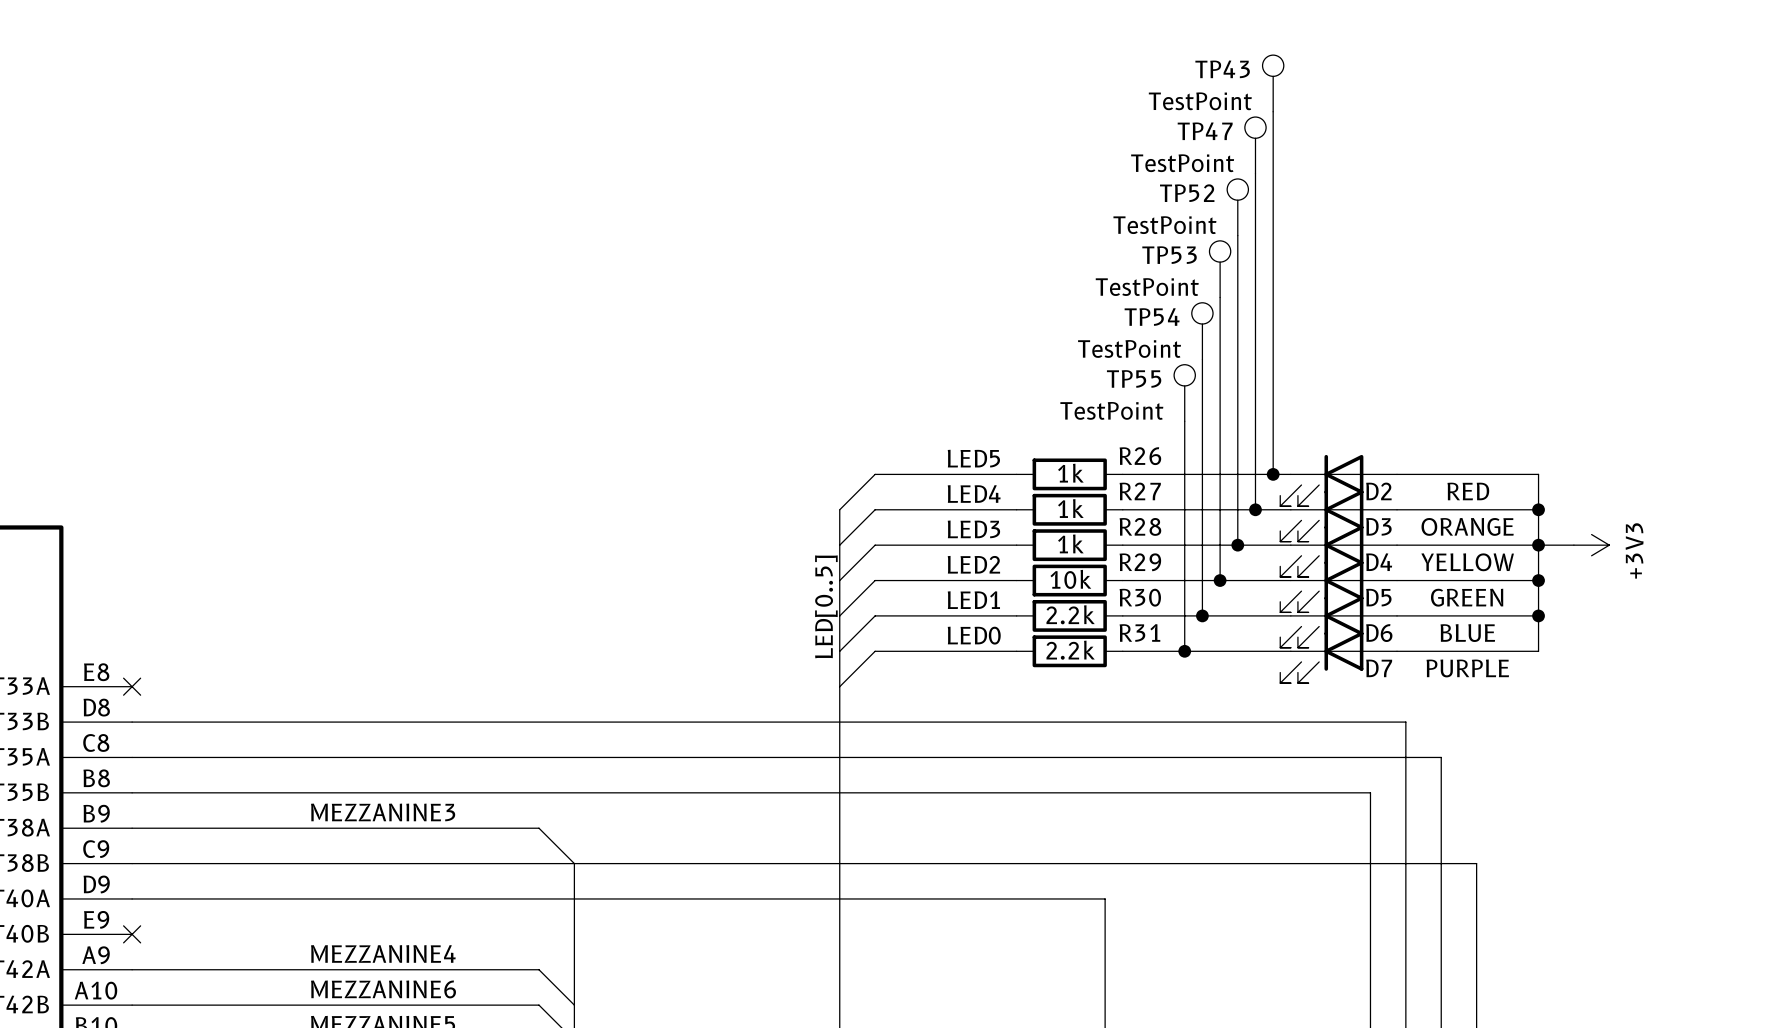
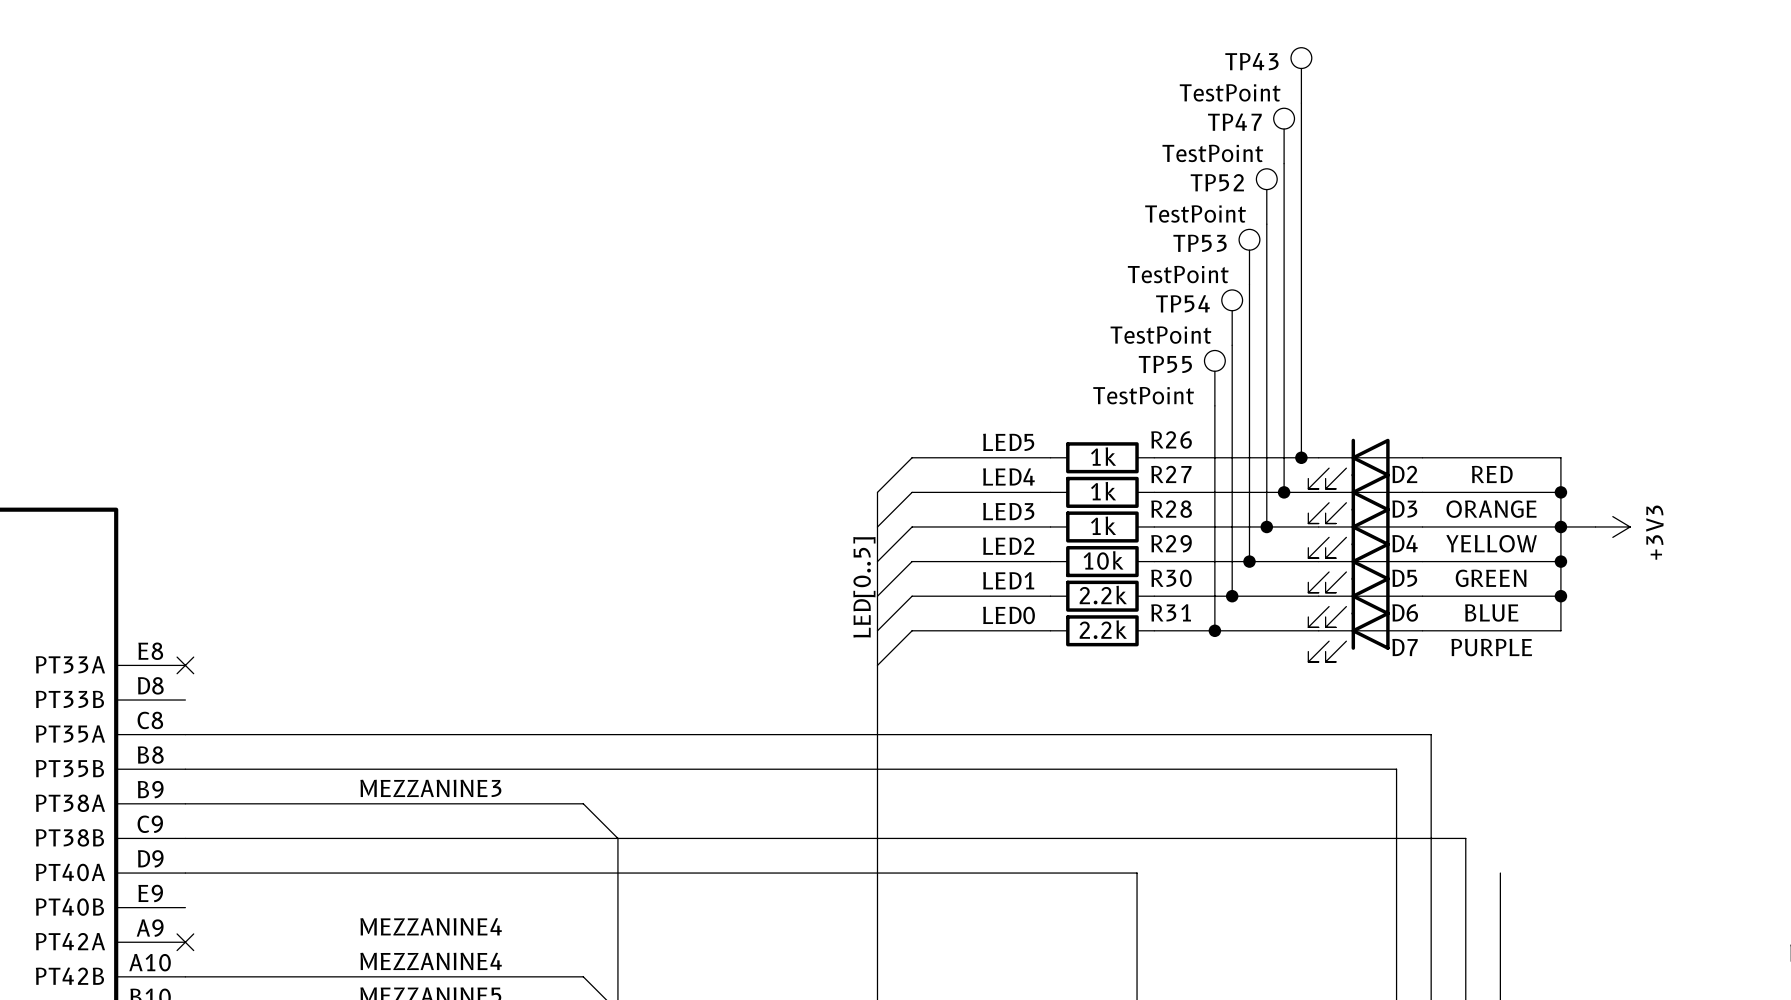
wire: (132, 722) (1405, 722) (1405, 757) (1441, 757) (1441, 863) (1476, 863) (1476, 898) -> none
no-connect mark position: (132, 934) -> (185, 942)
wire: (132, 969) (539, 969) (574, 1005) -> none
label: MEZZANINE6 (383, 989) -> MEZZANINE4 (431, 961)

